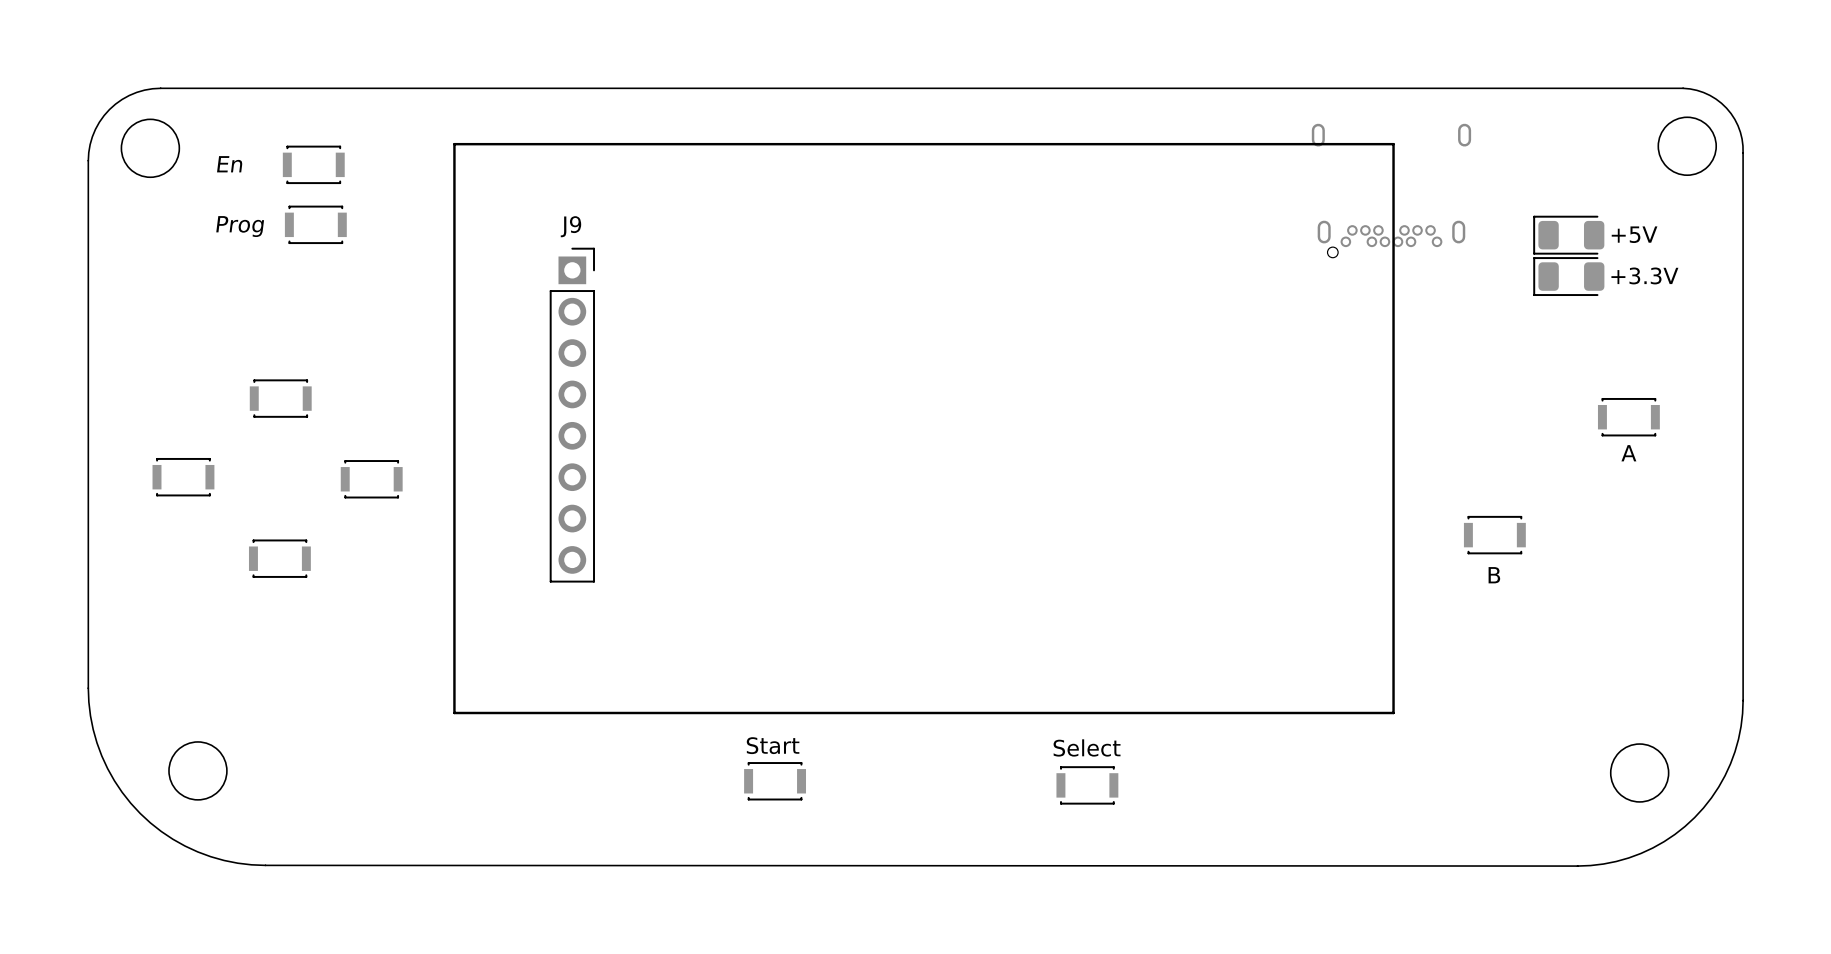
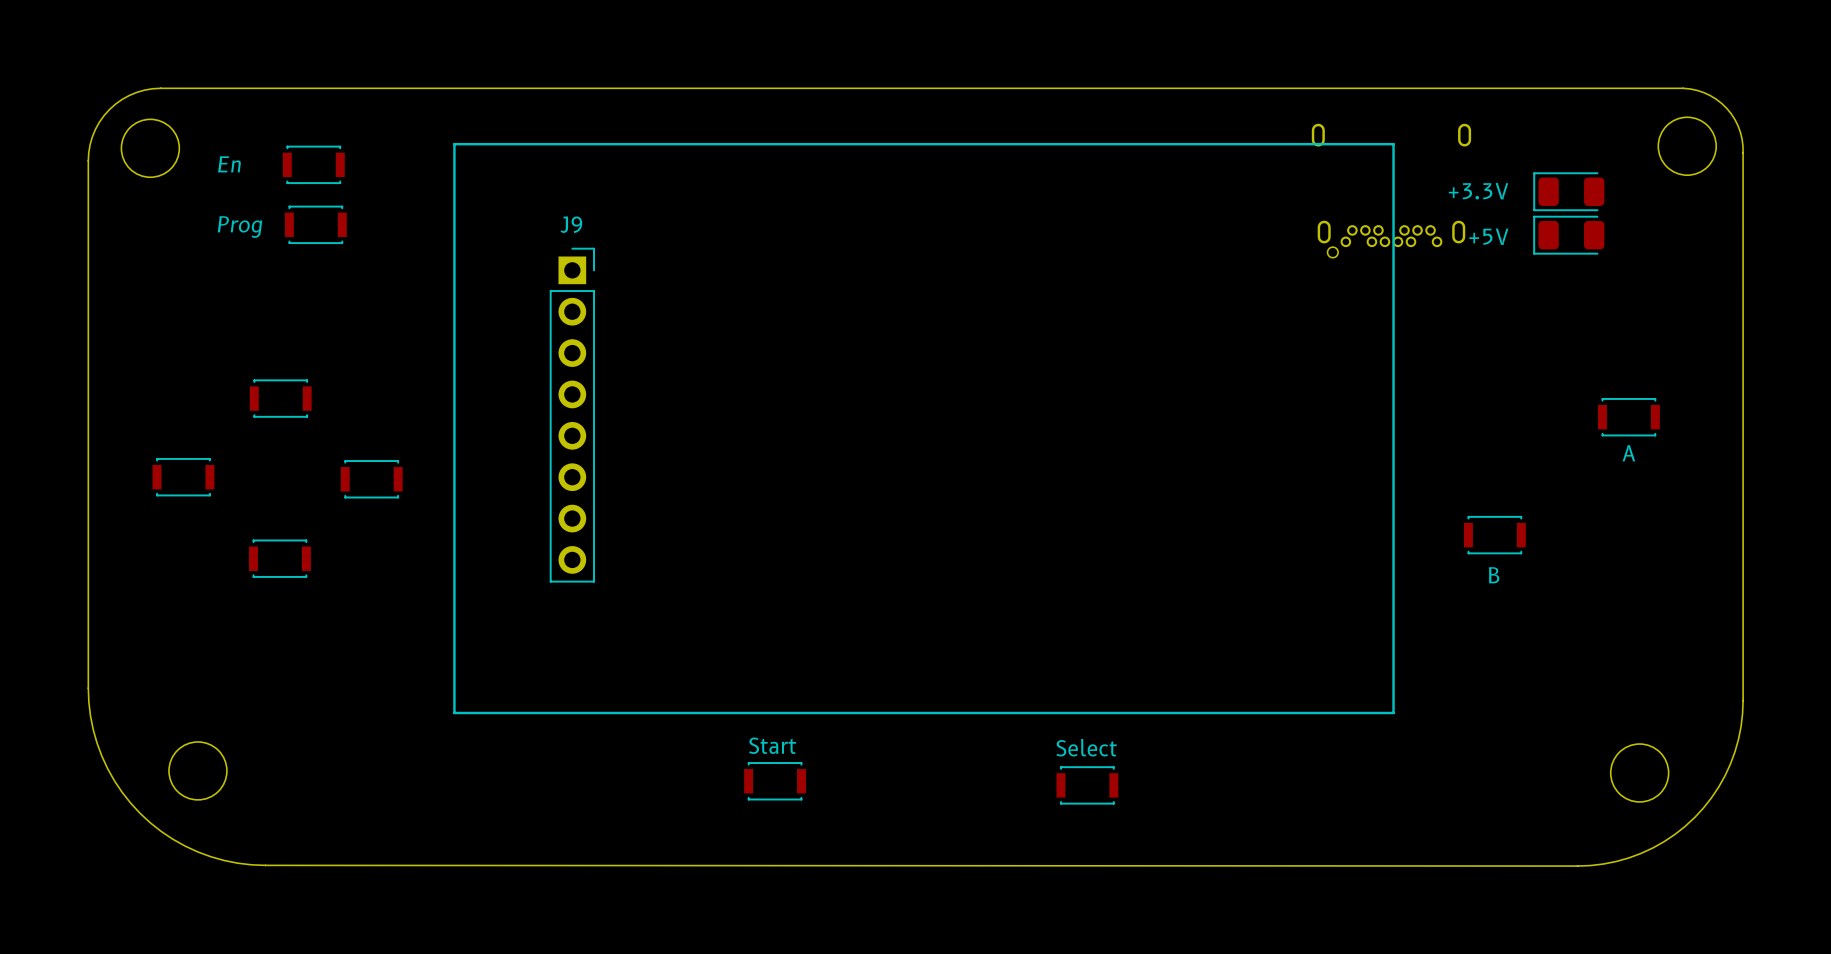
part: none -> (1568, 191)
part text position: +5V (1634, 234) -> +5V (1488, 236)
part: (1568, 276) -> none

